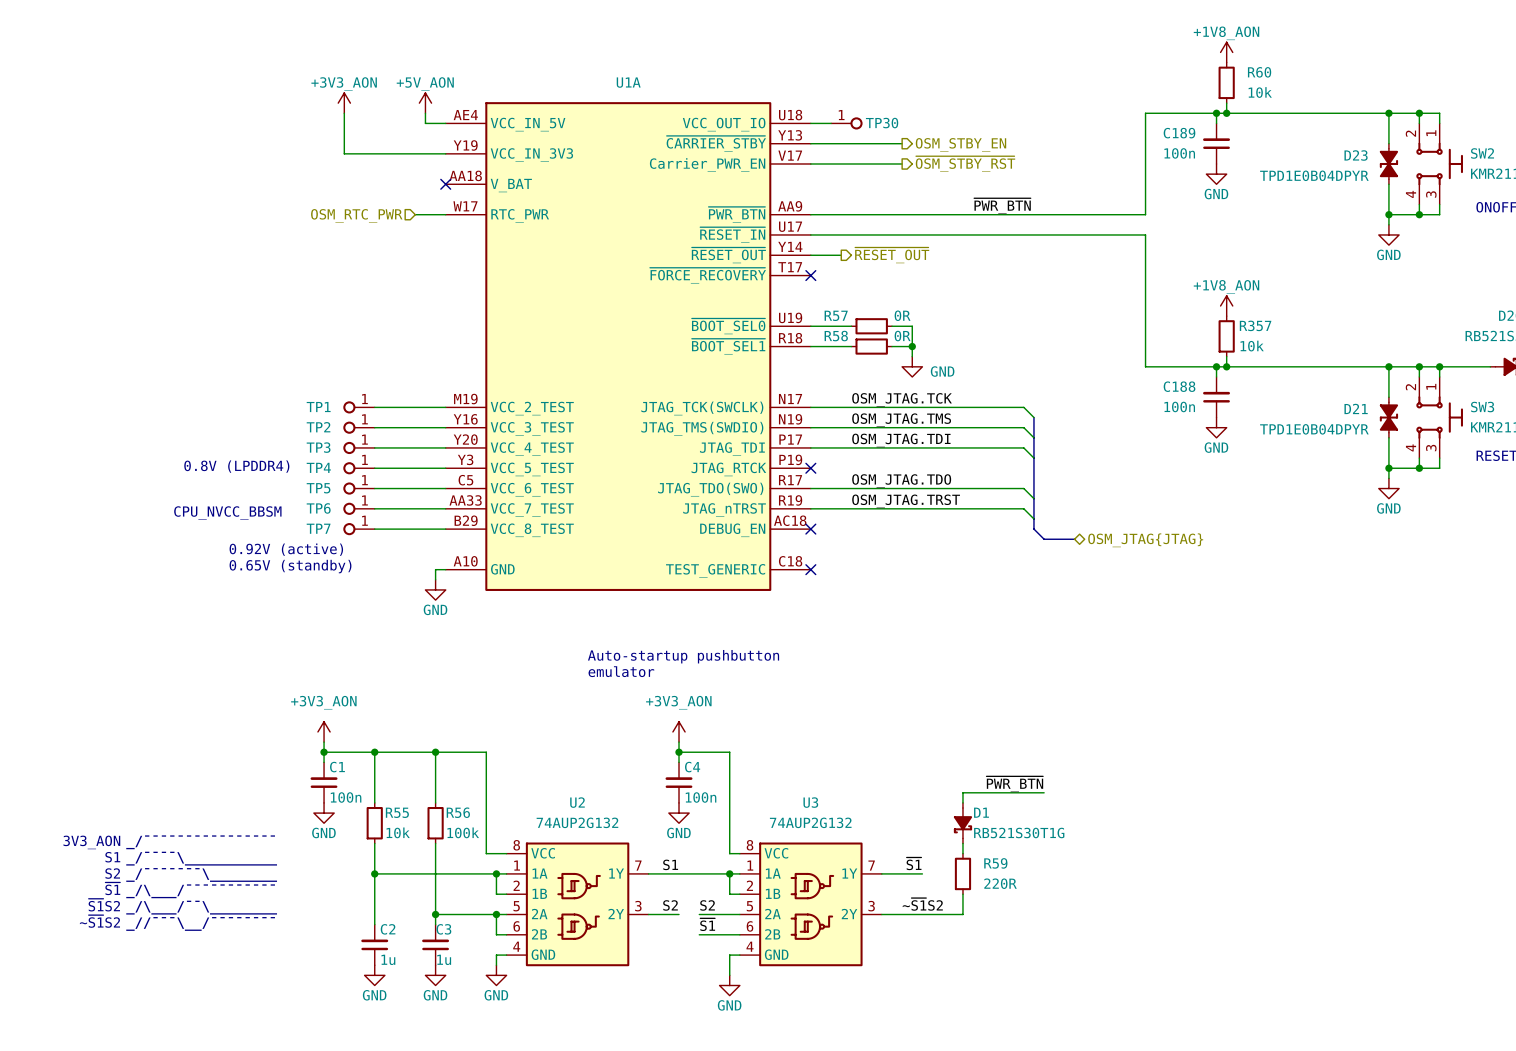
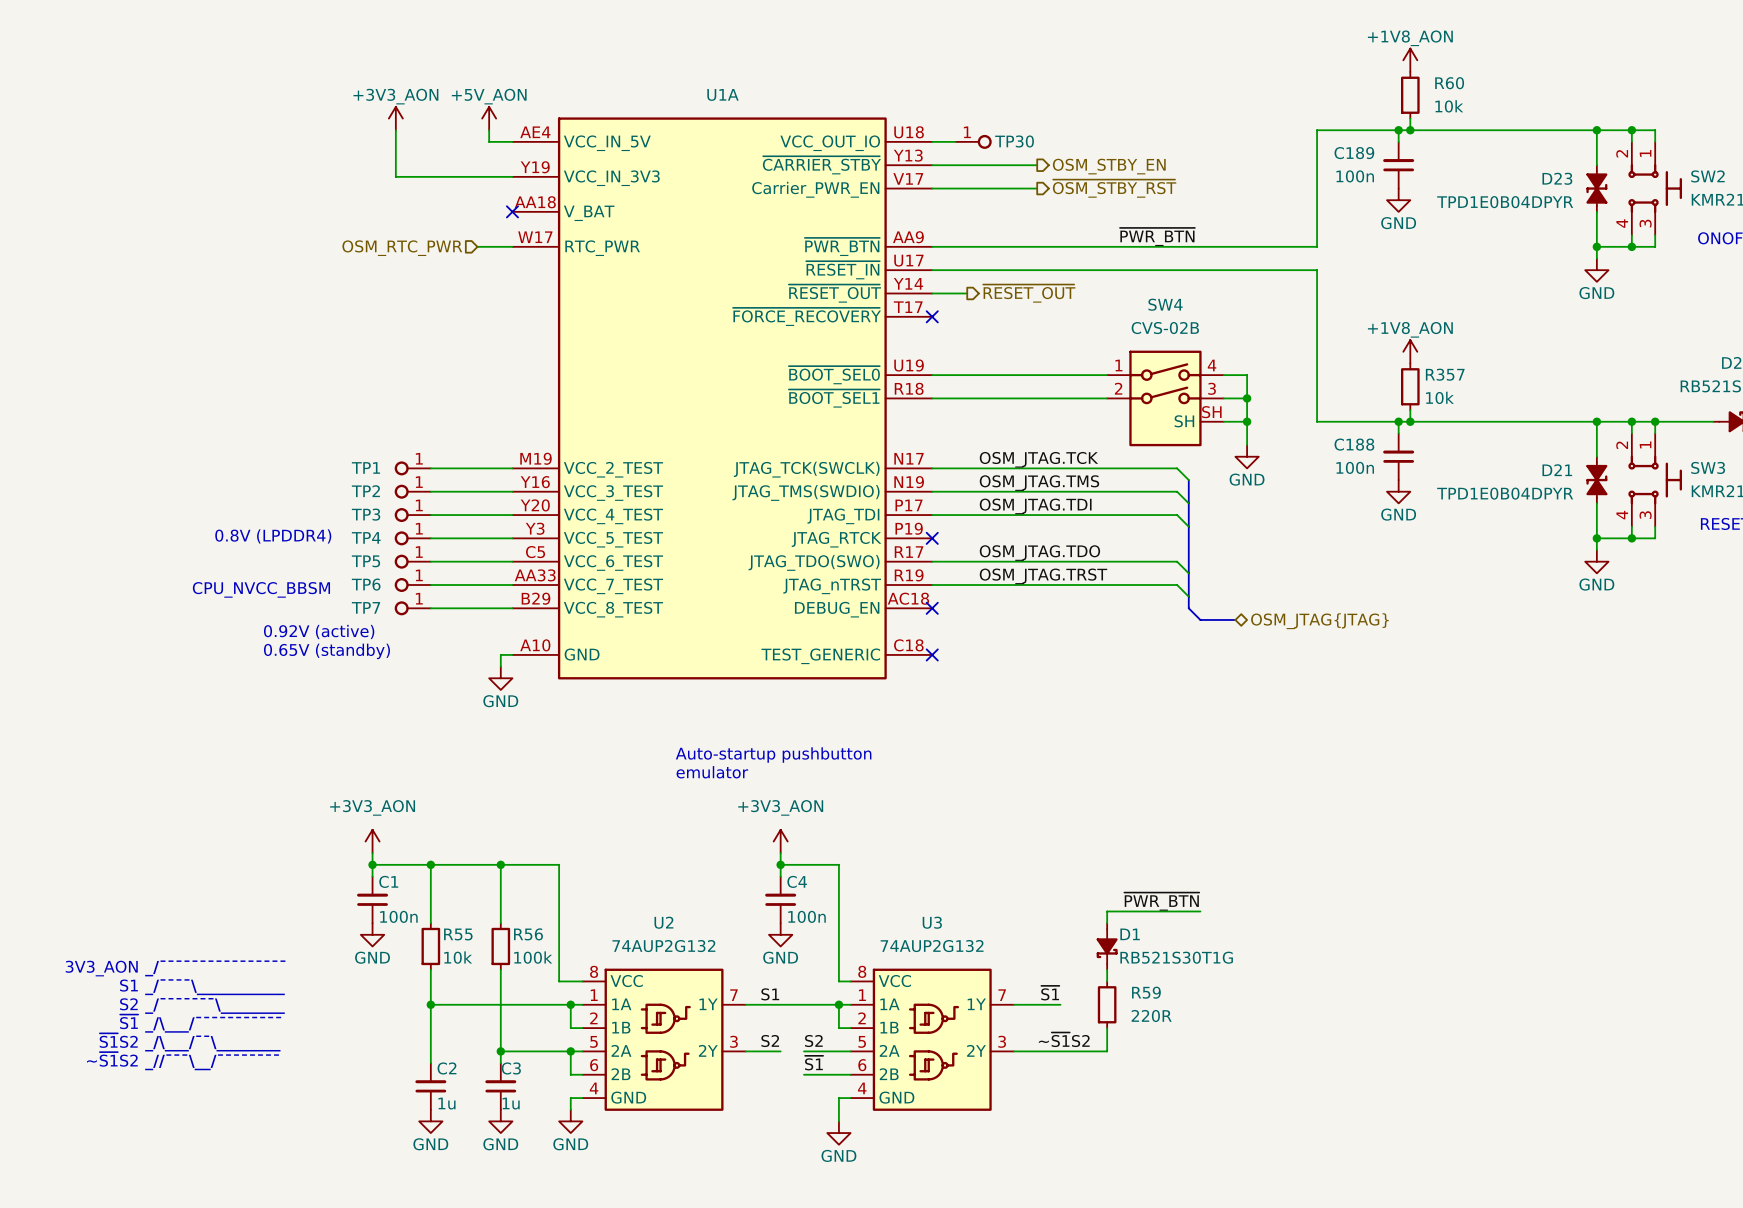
wire: none -> (978, 375) (1025, 375)
R57: (871, 326) -> none
wire: (912, 326) (912, 356) -> (1048, 375) (1107, 375)
wire: none -> (1223, 375) (1247, 375) (1247, 445)
wire: none -> (978, 398) (1025, 398)
R58: (871, 346) -> none
wire: none -> (1048, 398) (1107, 398)
junction: (912, 346) -> none
SW4: none -> (1165, 398)
wire: none -> (1223, 398) (1247, 398)
junction: none -> (1247, 398)
power symbol position: GND (912, 366) -> GND (1247, 456)
wire: none -> (1223, 421) (1247, 421)
junction: none -> (1247, 421)
power symbol text position: GND (942, 371) -> GND (1247, 479)

